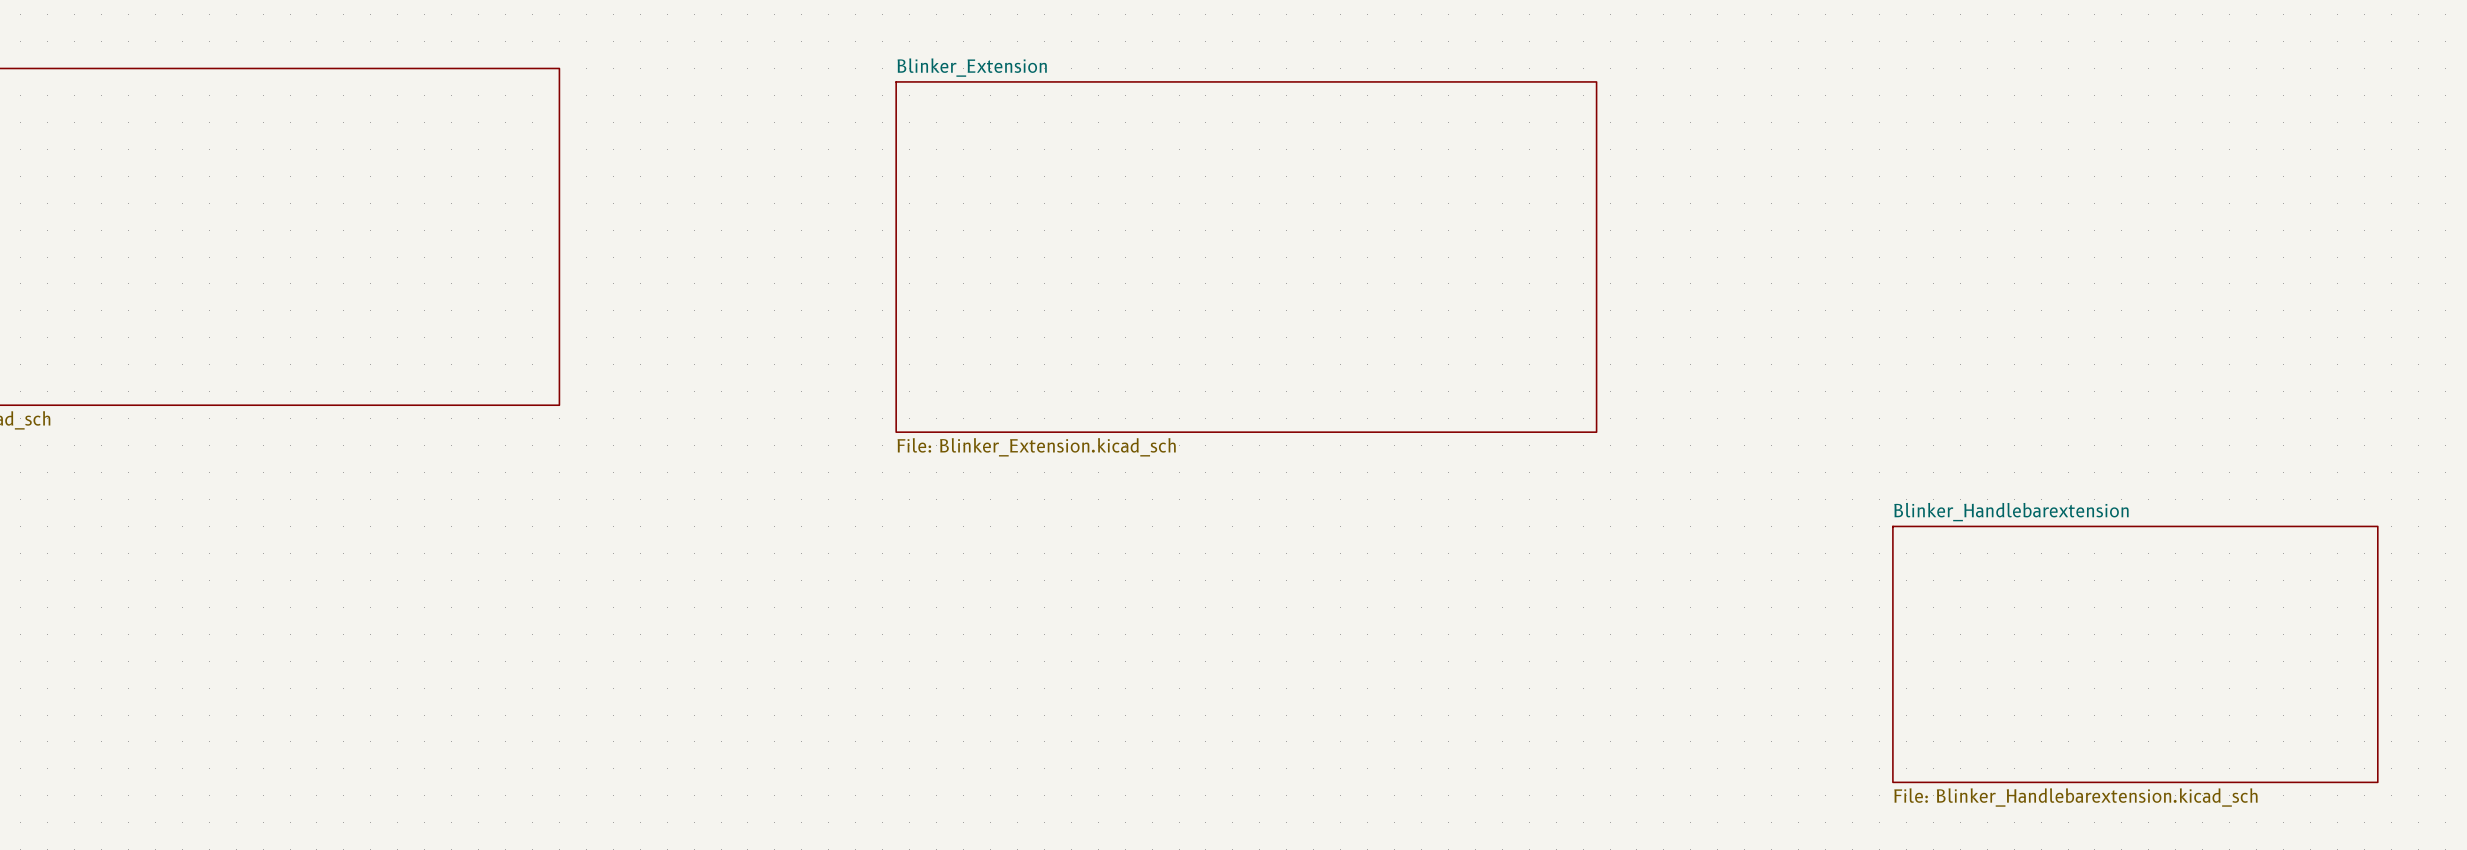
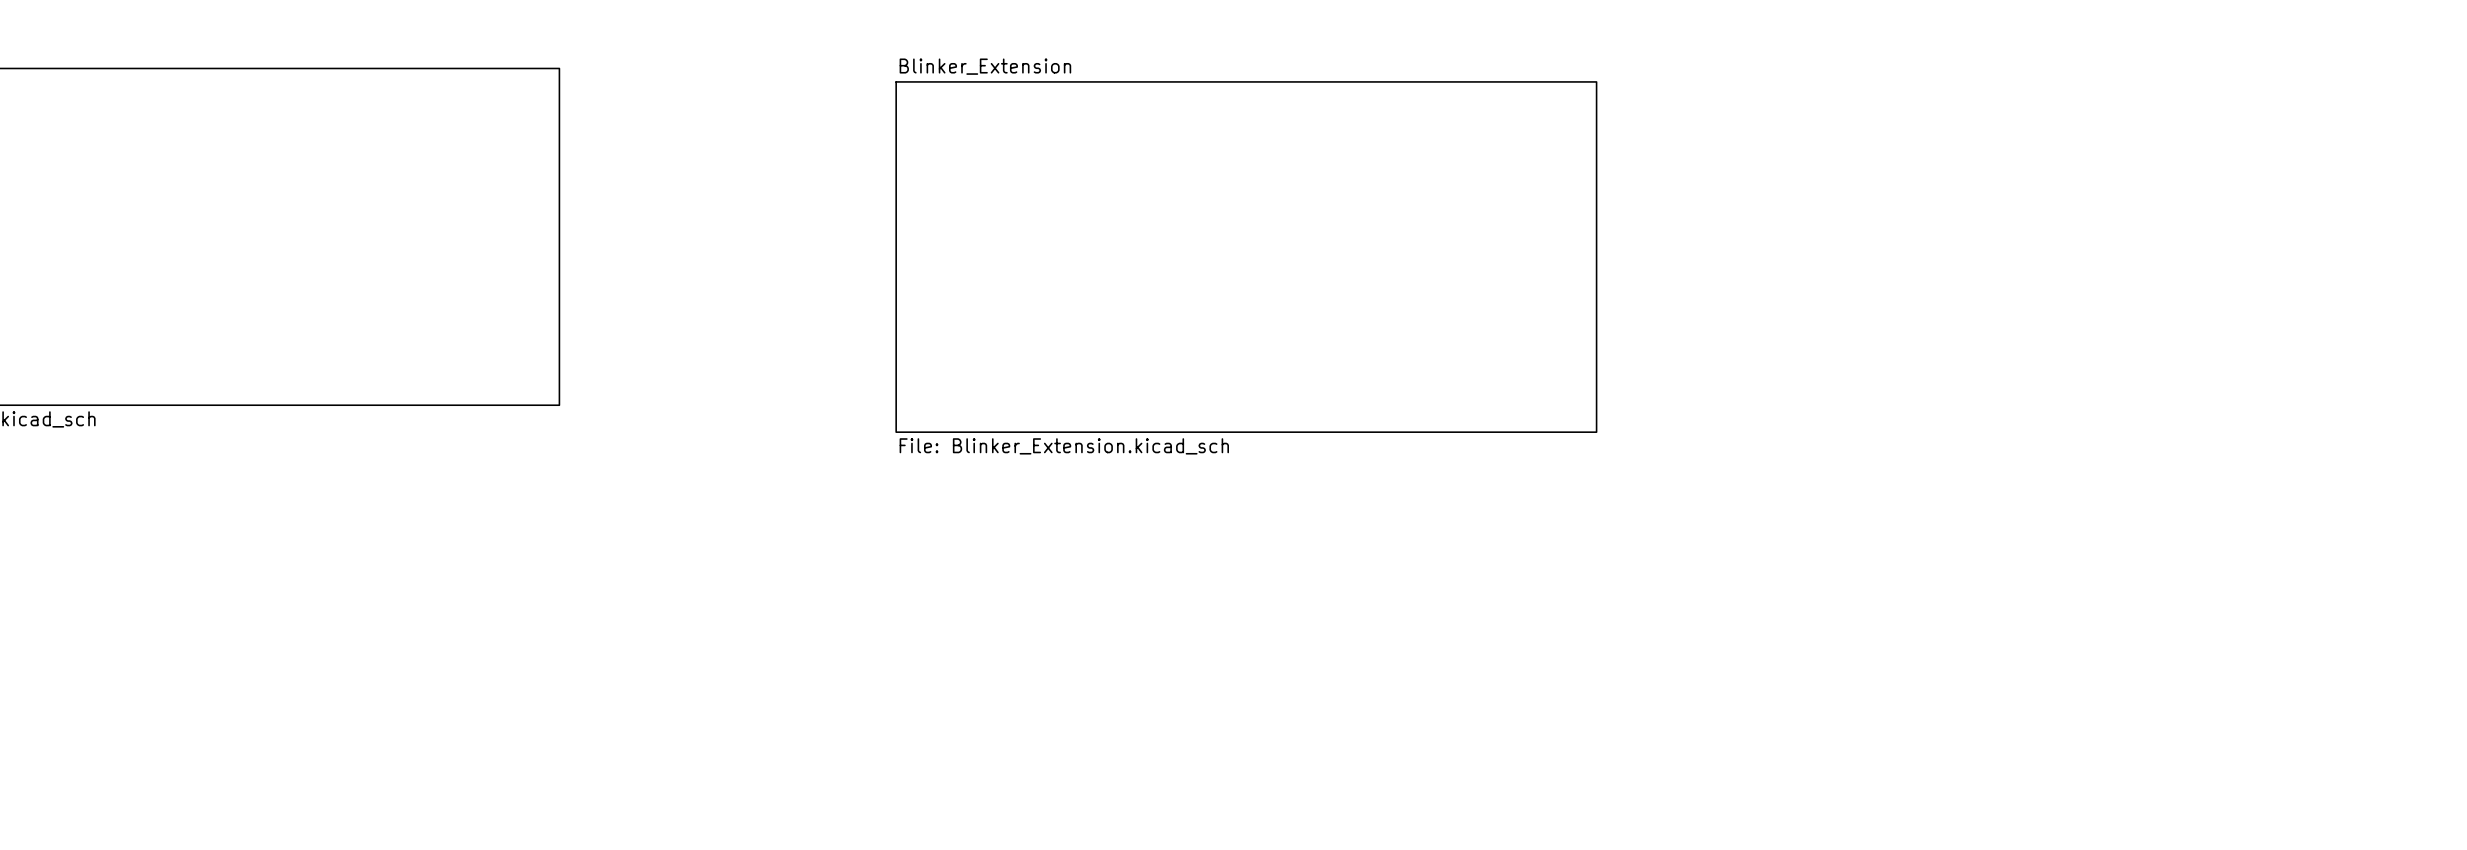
sheet Blinker_Handlebarextension: File: Blinker_Handlebarextension.kicad_sch (2135, 654) -> none

